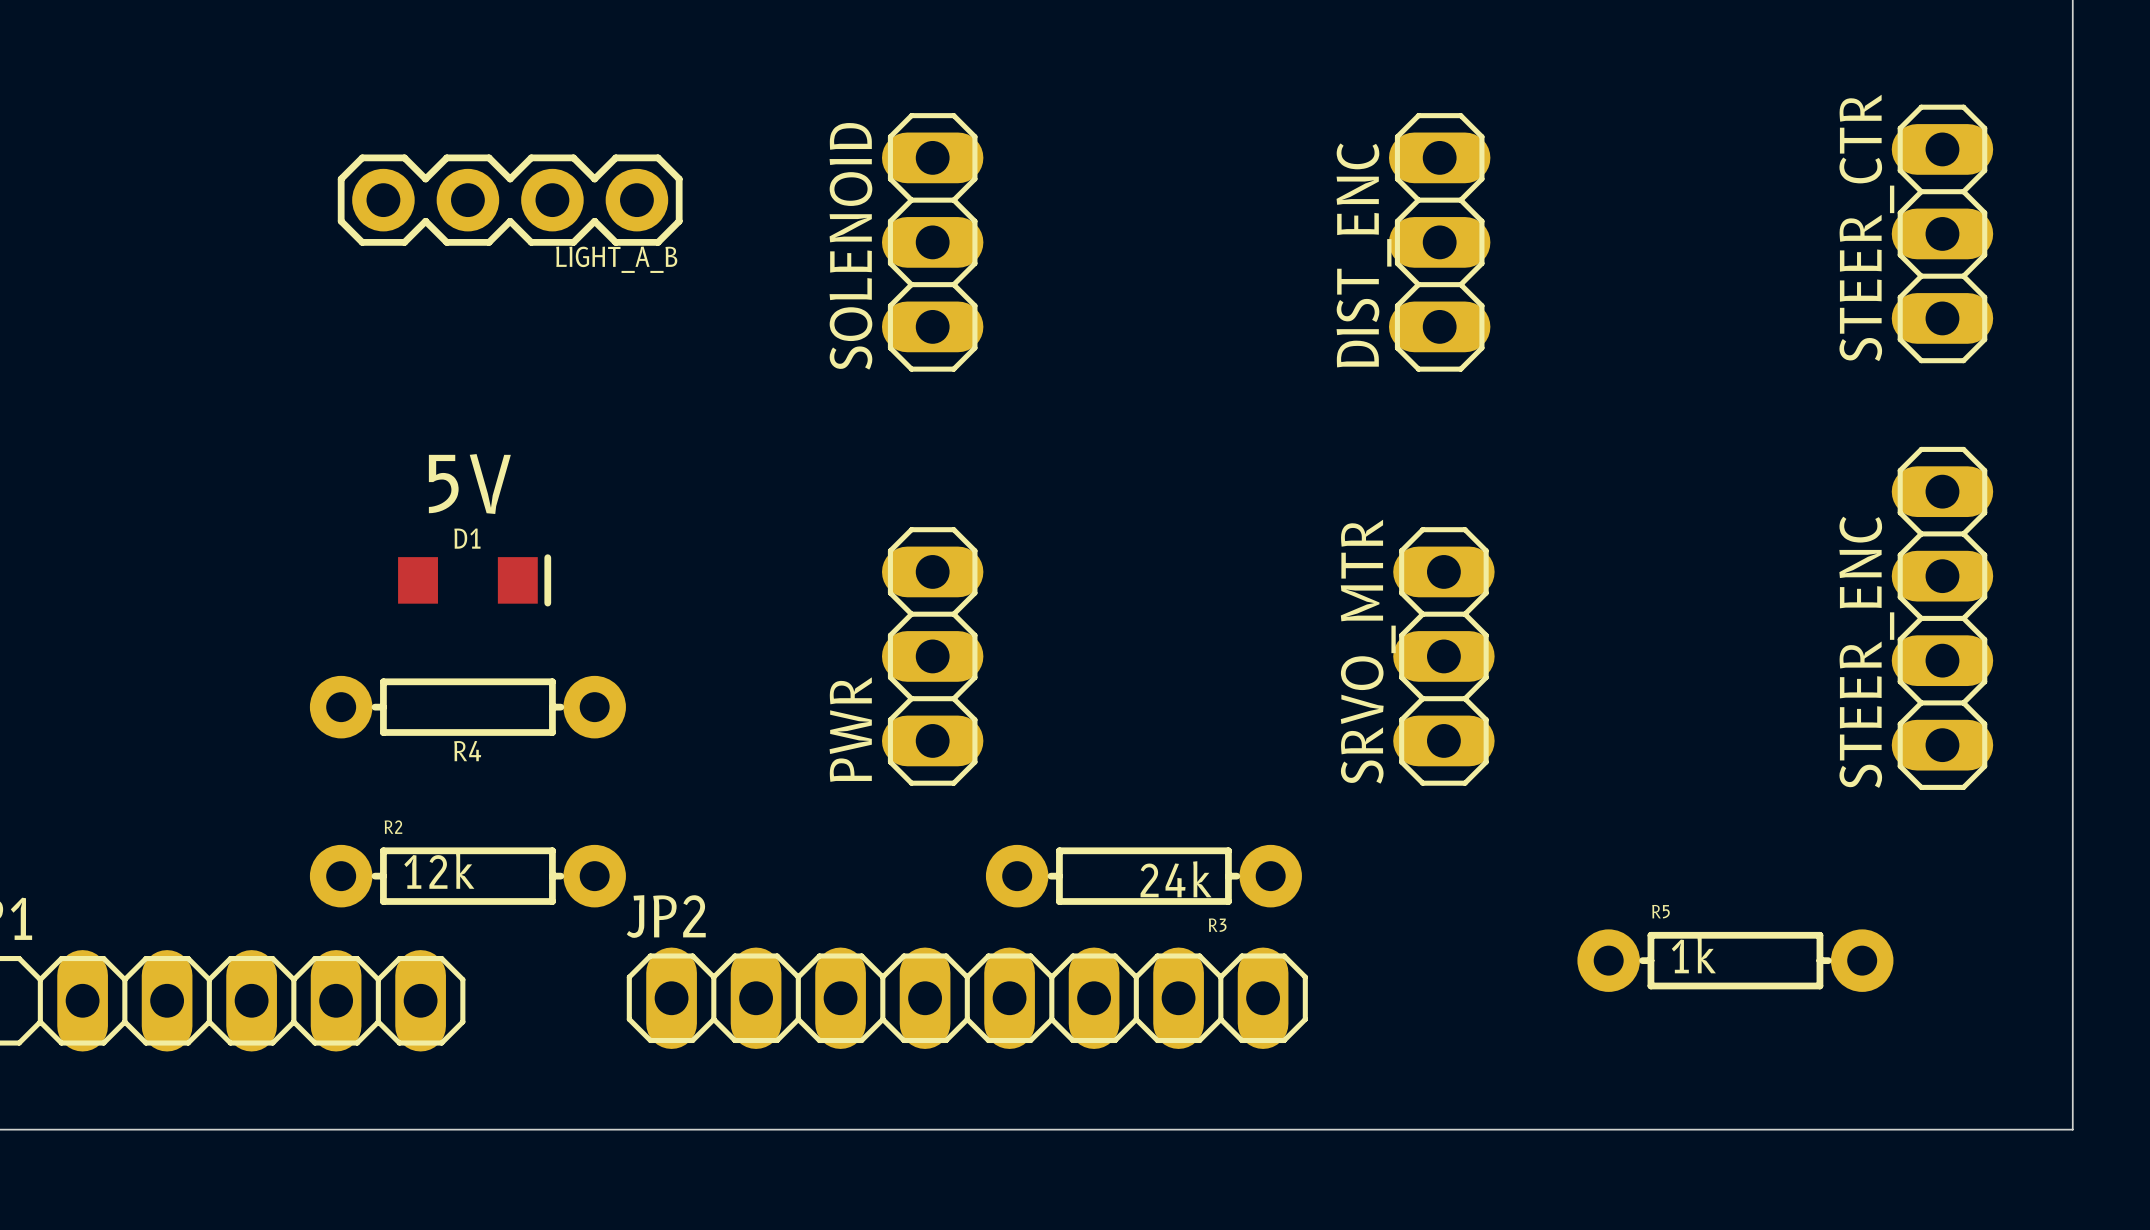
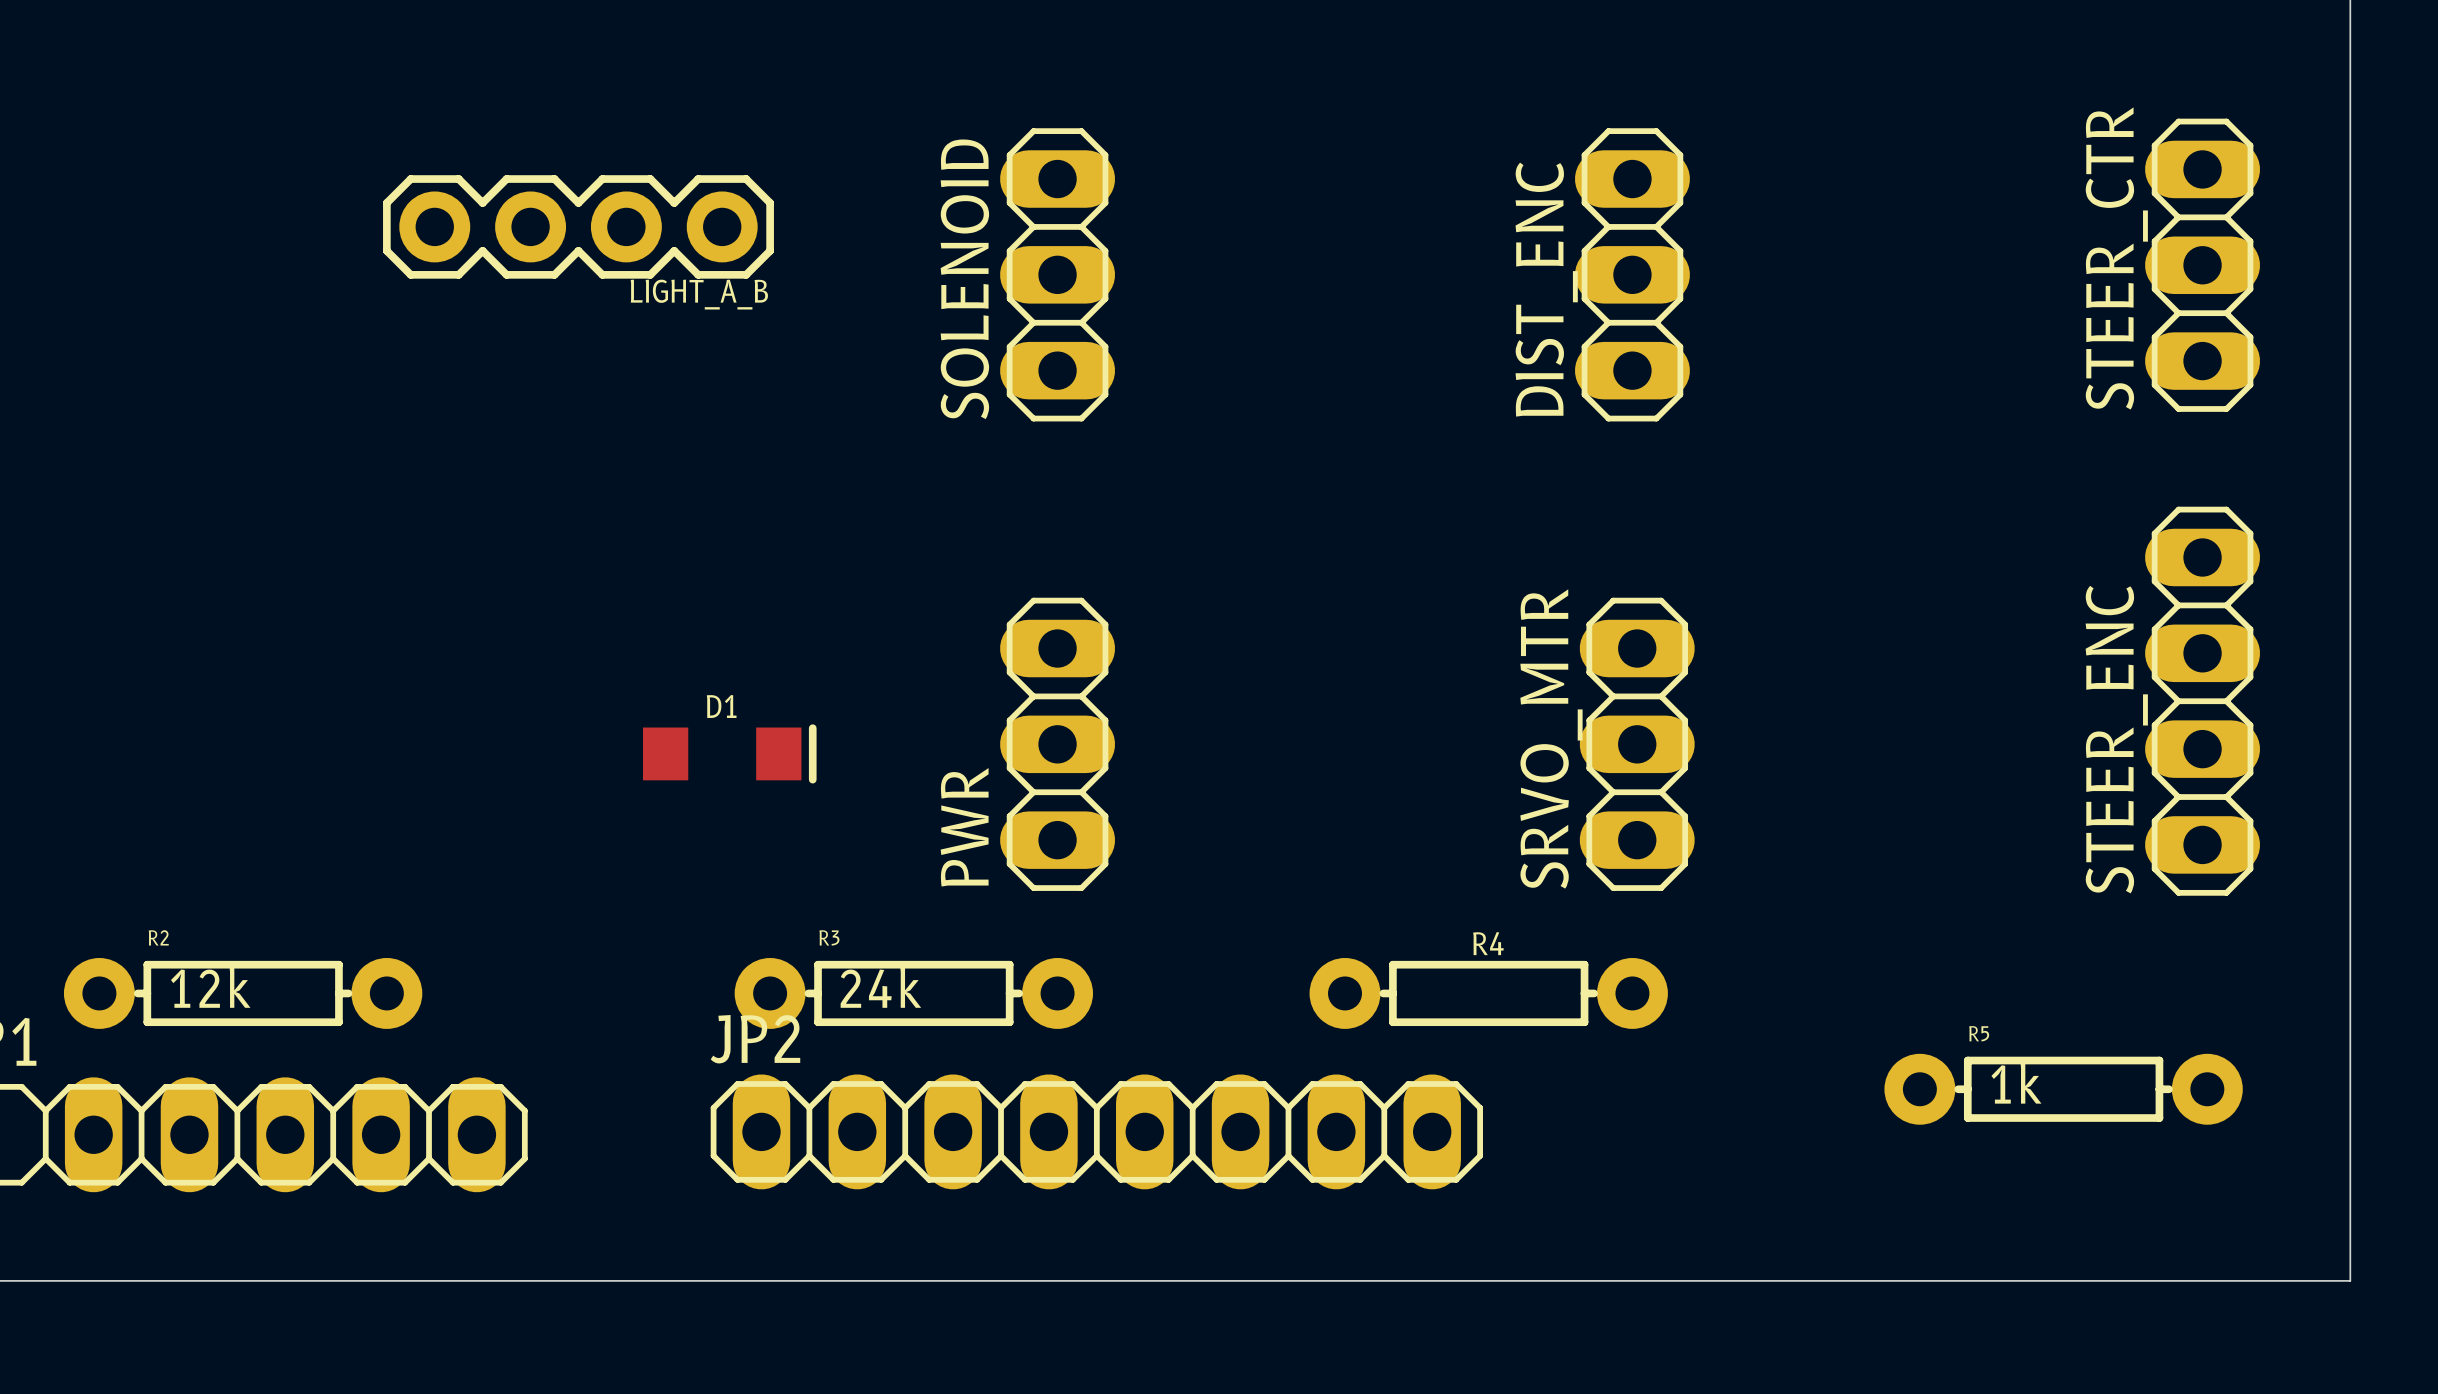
text: 5V (469, 484) -> none
D1 position: (474, 580) -> (729, 753)
R4 position: (467, 707) -> (1488, 993)
R4 name position: R4 (467, 751) -> R4 (1488, 943)
R2 position: (467, 876) -> (243, 993)
R3 position: (1143, 876) -> (913, 993)
R3 value position: 24k (1176, 879) -> 24k (880, 987)
R3 name position: R3 (1217, 925) -> R3 (829, 937)
R5 position: (1735, 960) -> (2063, 1089)

